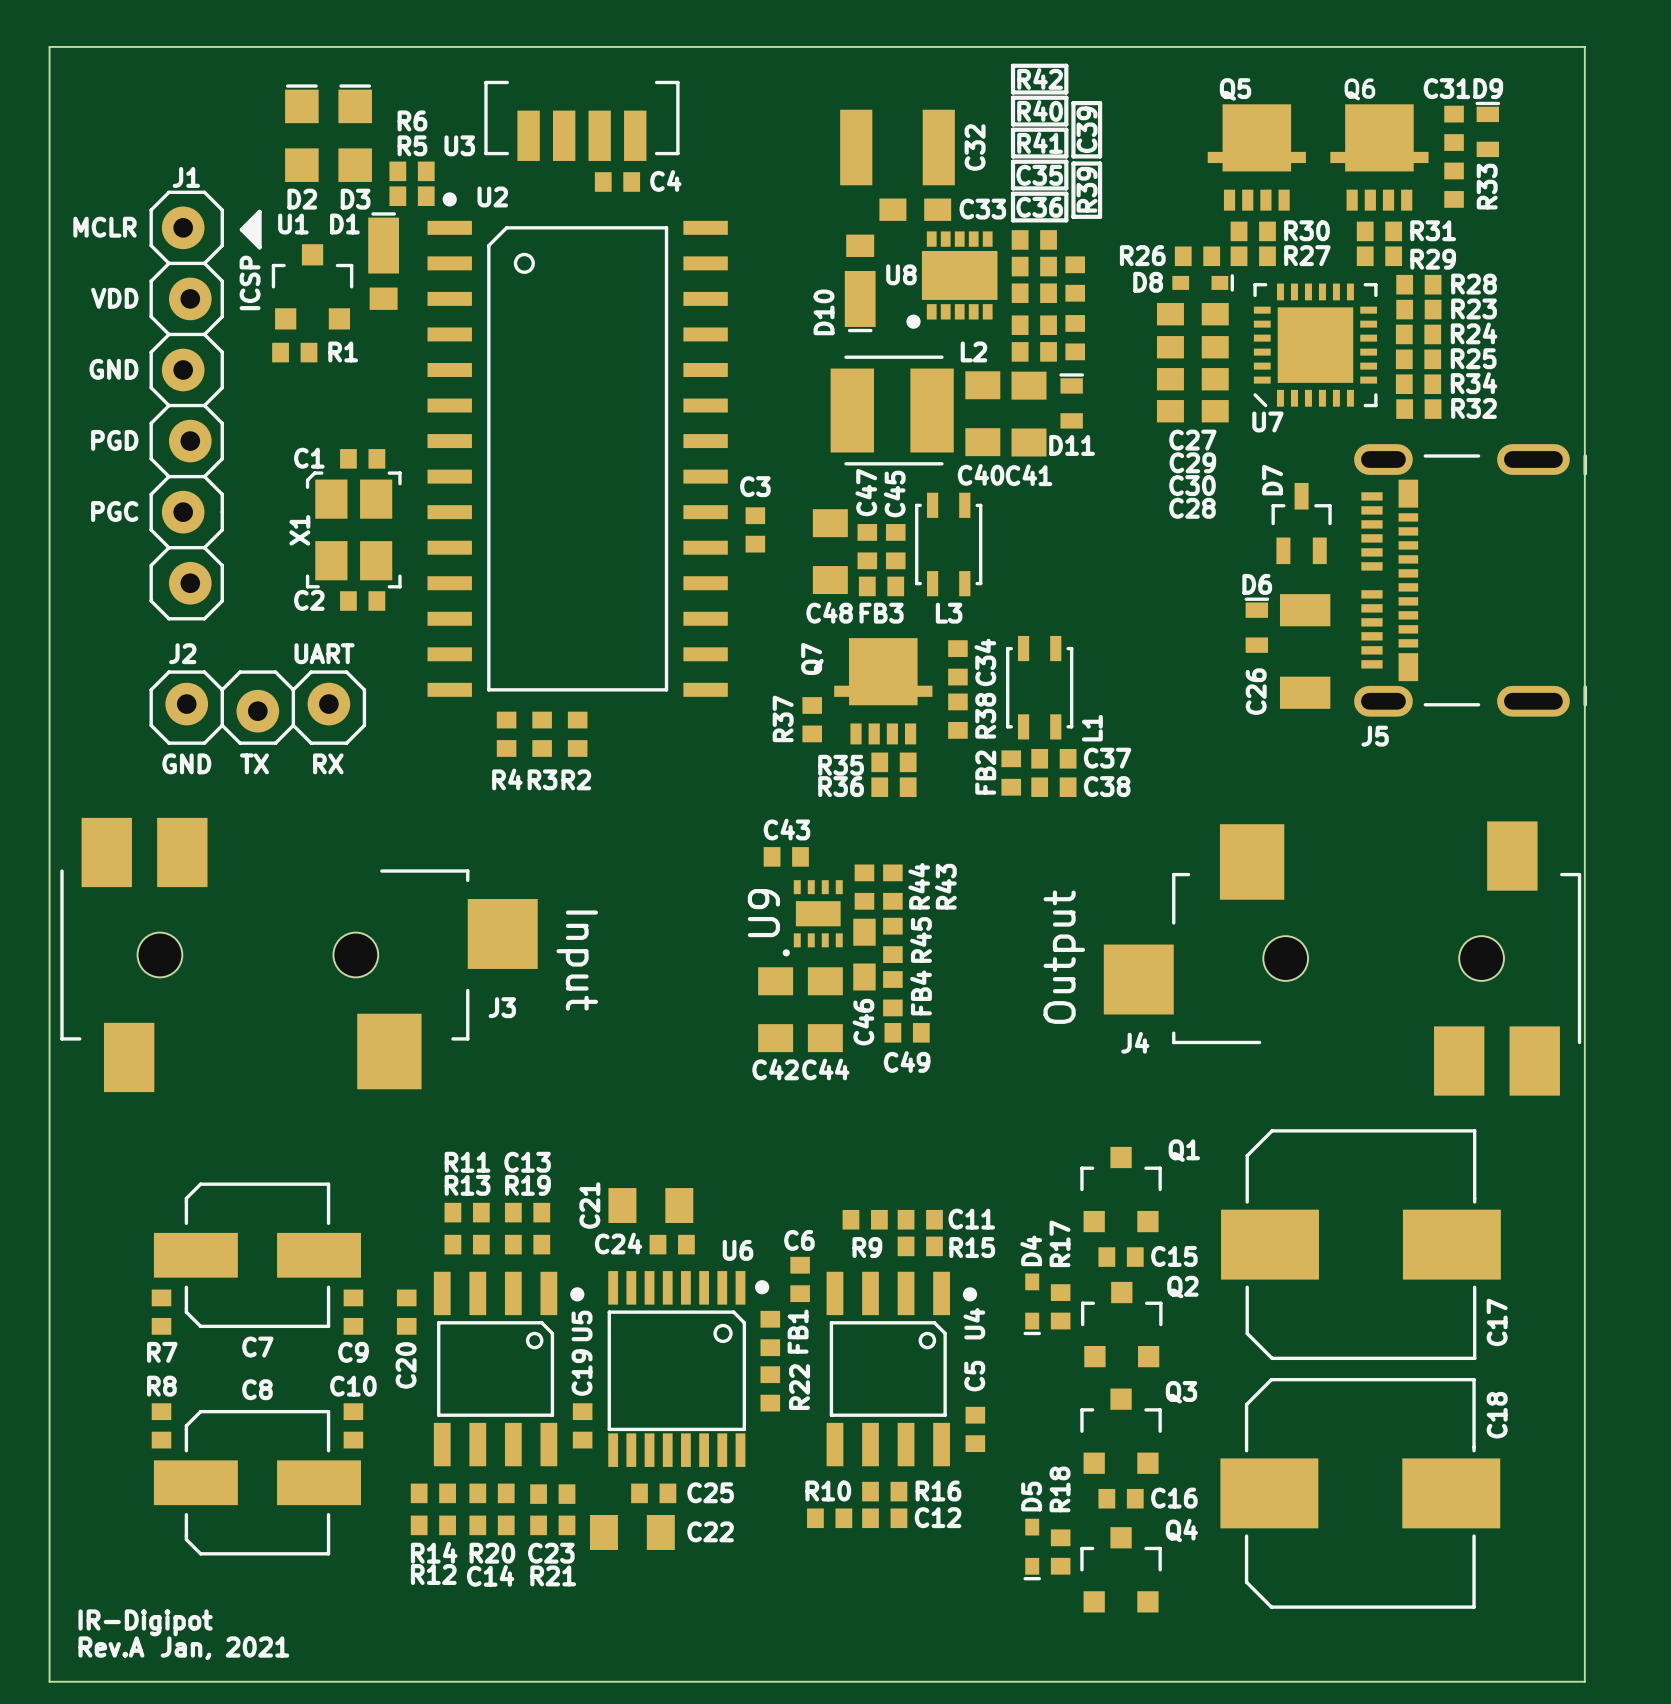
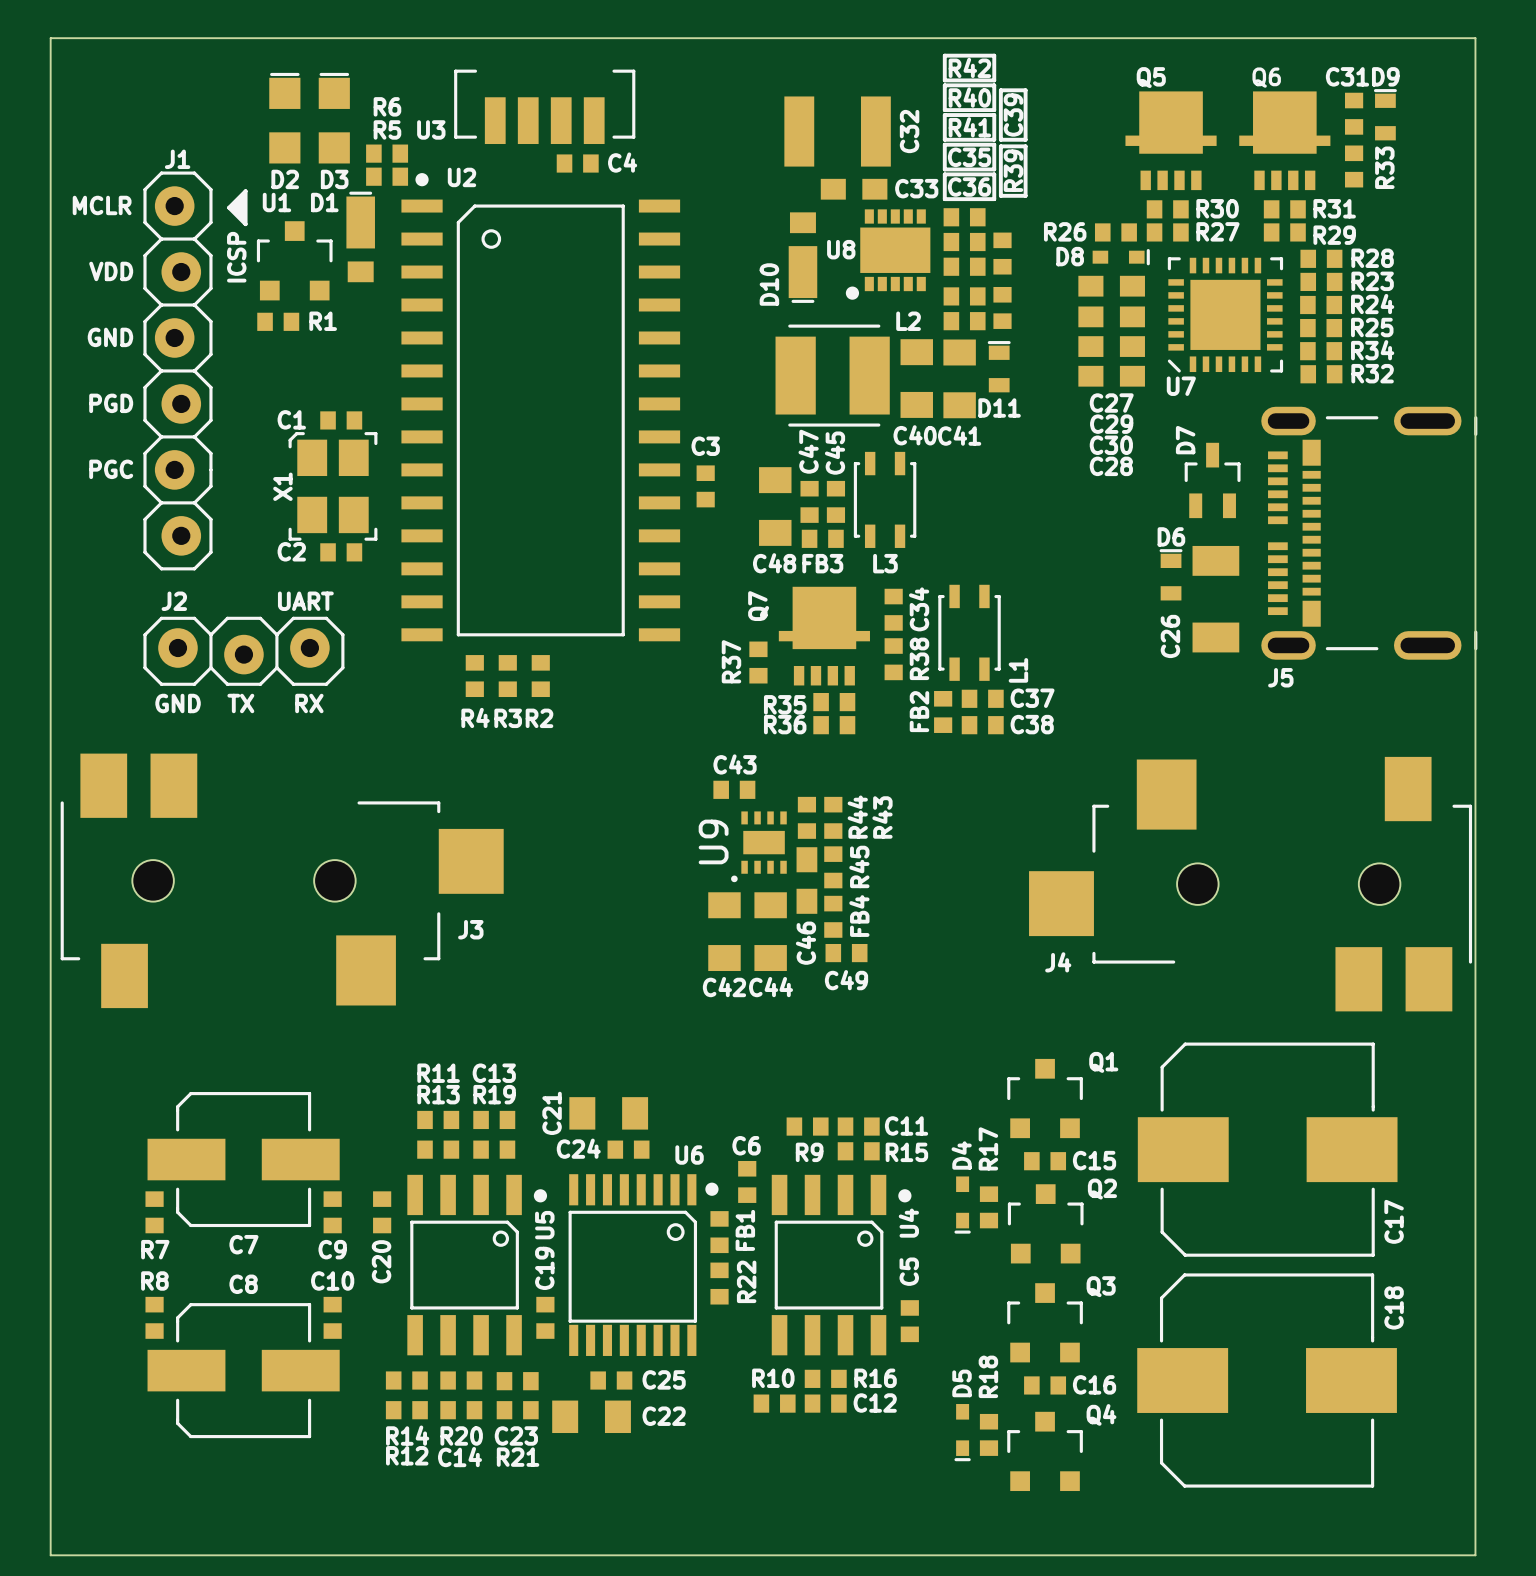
text: Output (1064, 957) -> none
text: Input (577, 960) -> none
text: IR-Digipot (145, 1622) -> none
text: Rev.A (111, 1646) -> none
text: Jan, 2021 (224, 1648) -> none

